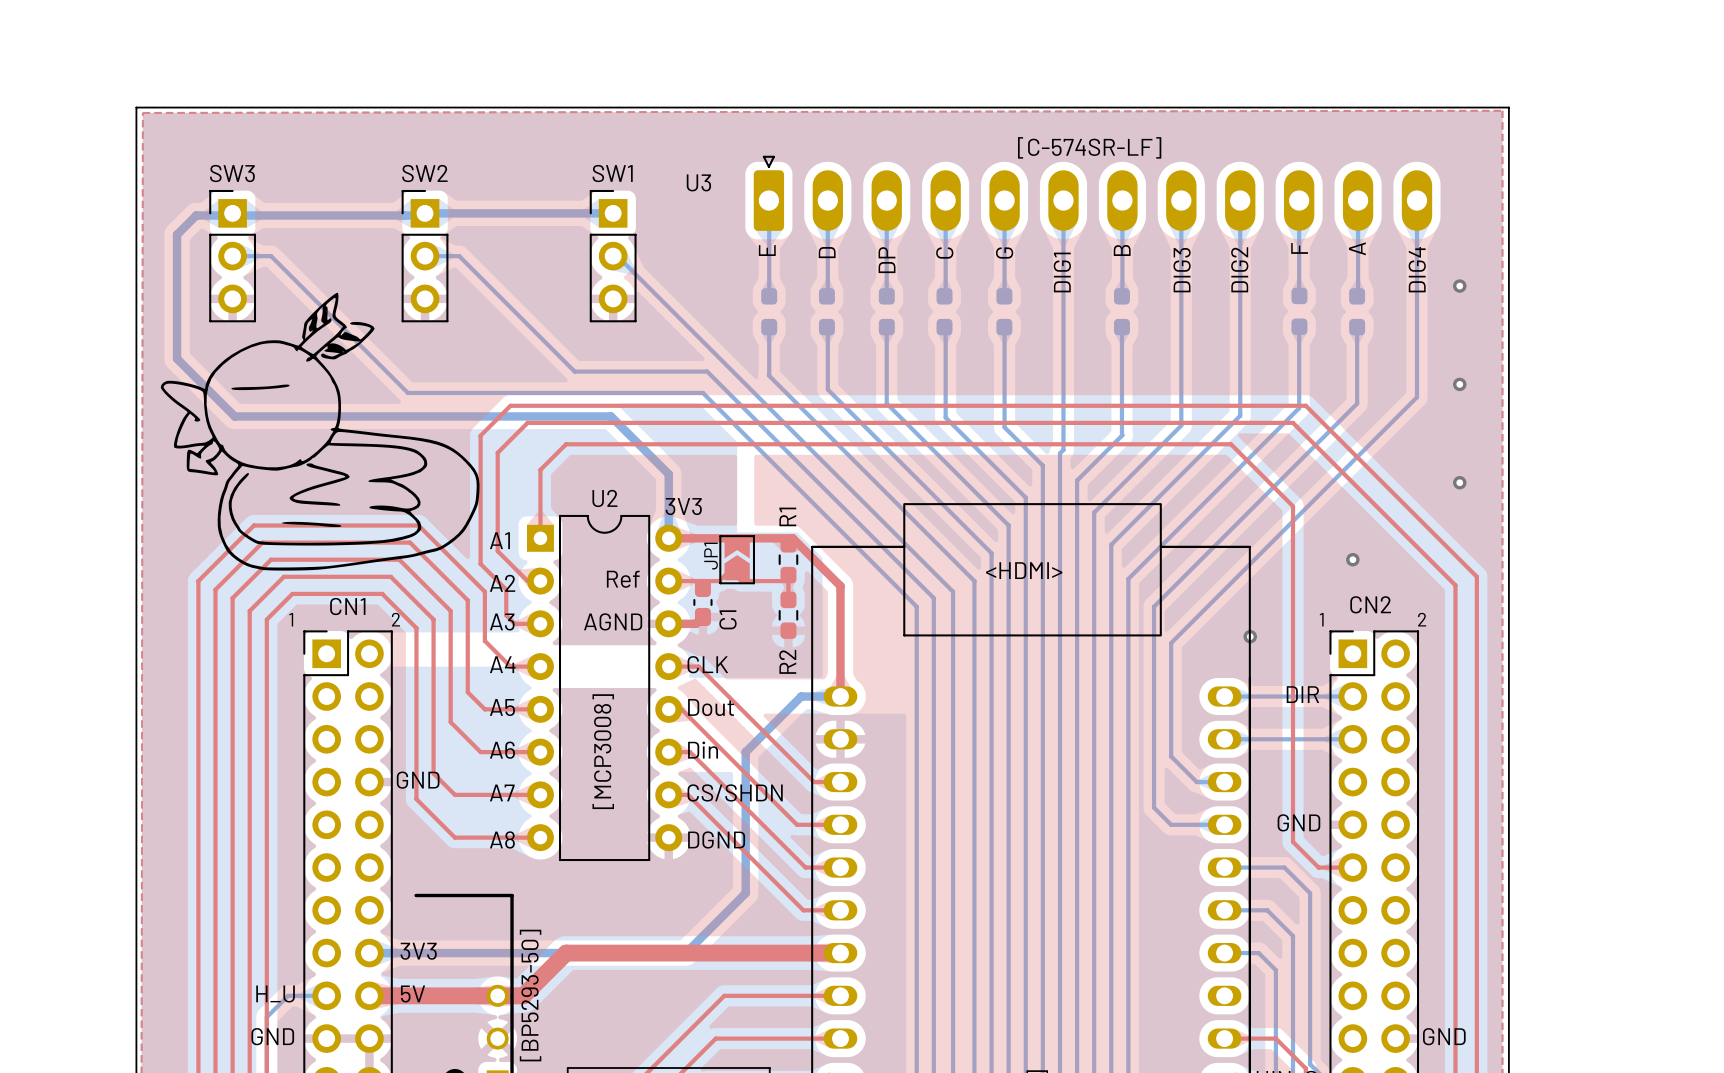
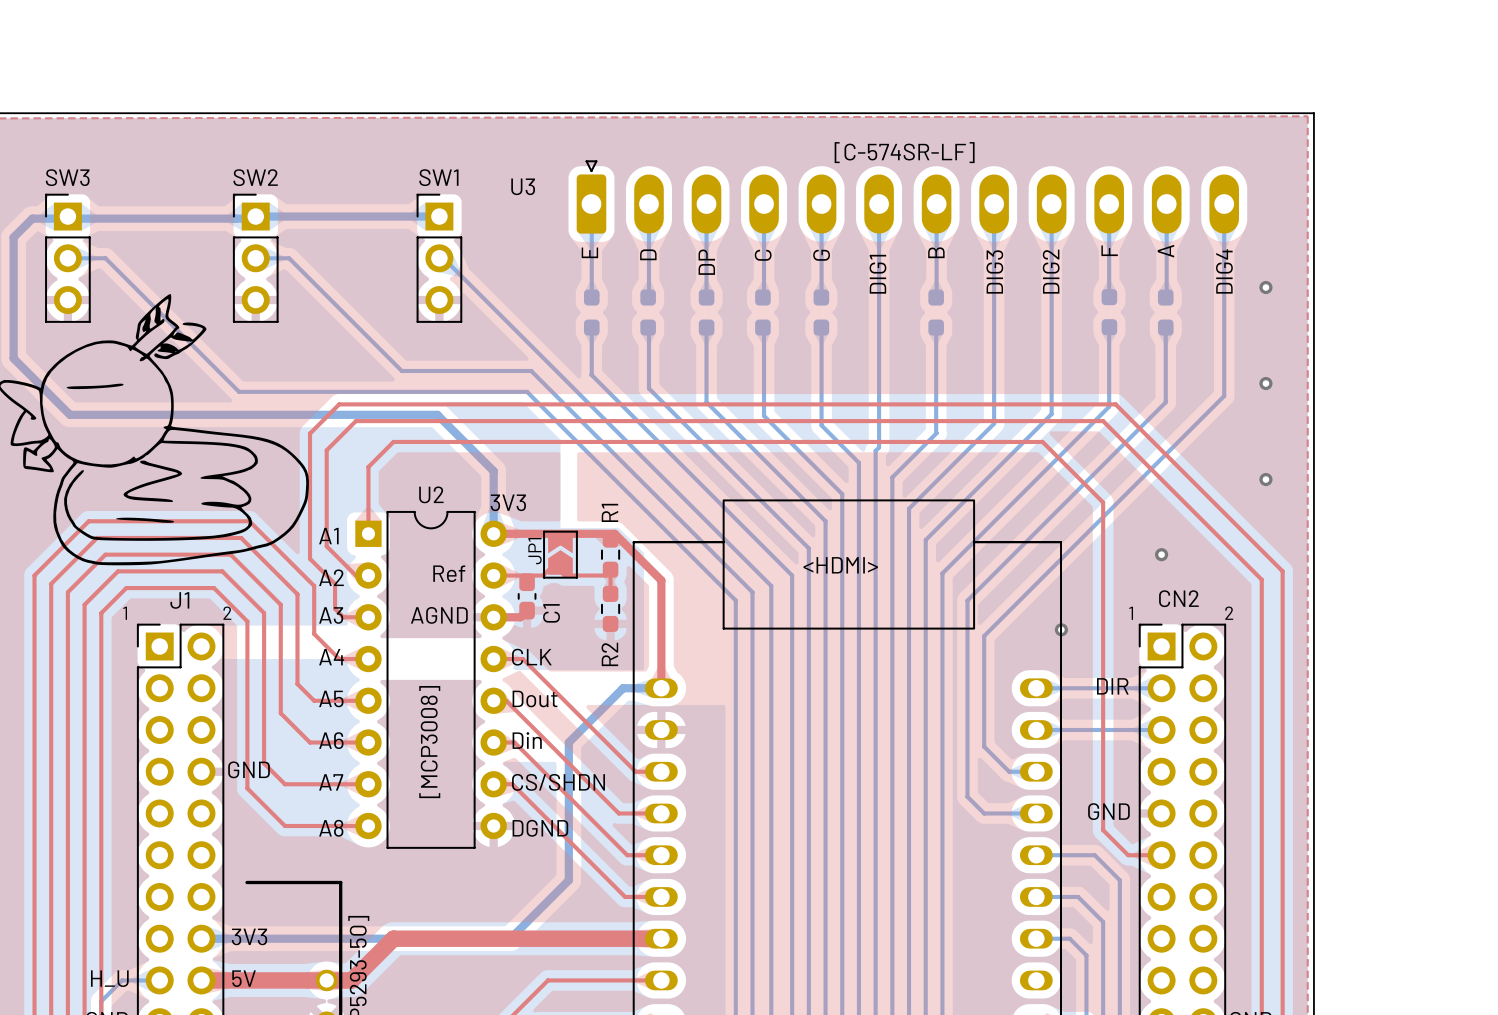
CN1 name: CN1 (347, 606) -> J1 (179, 600)

